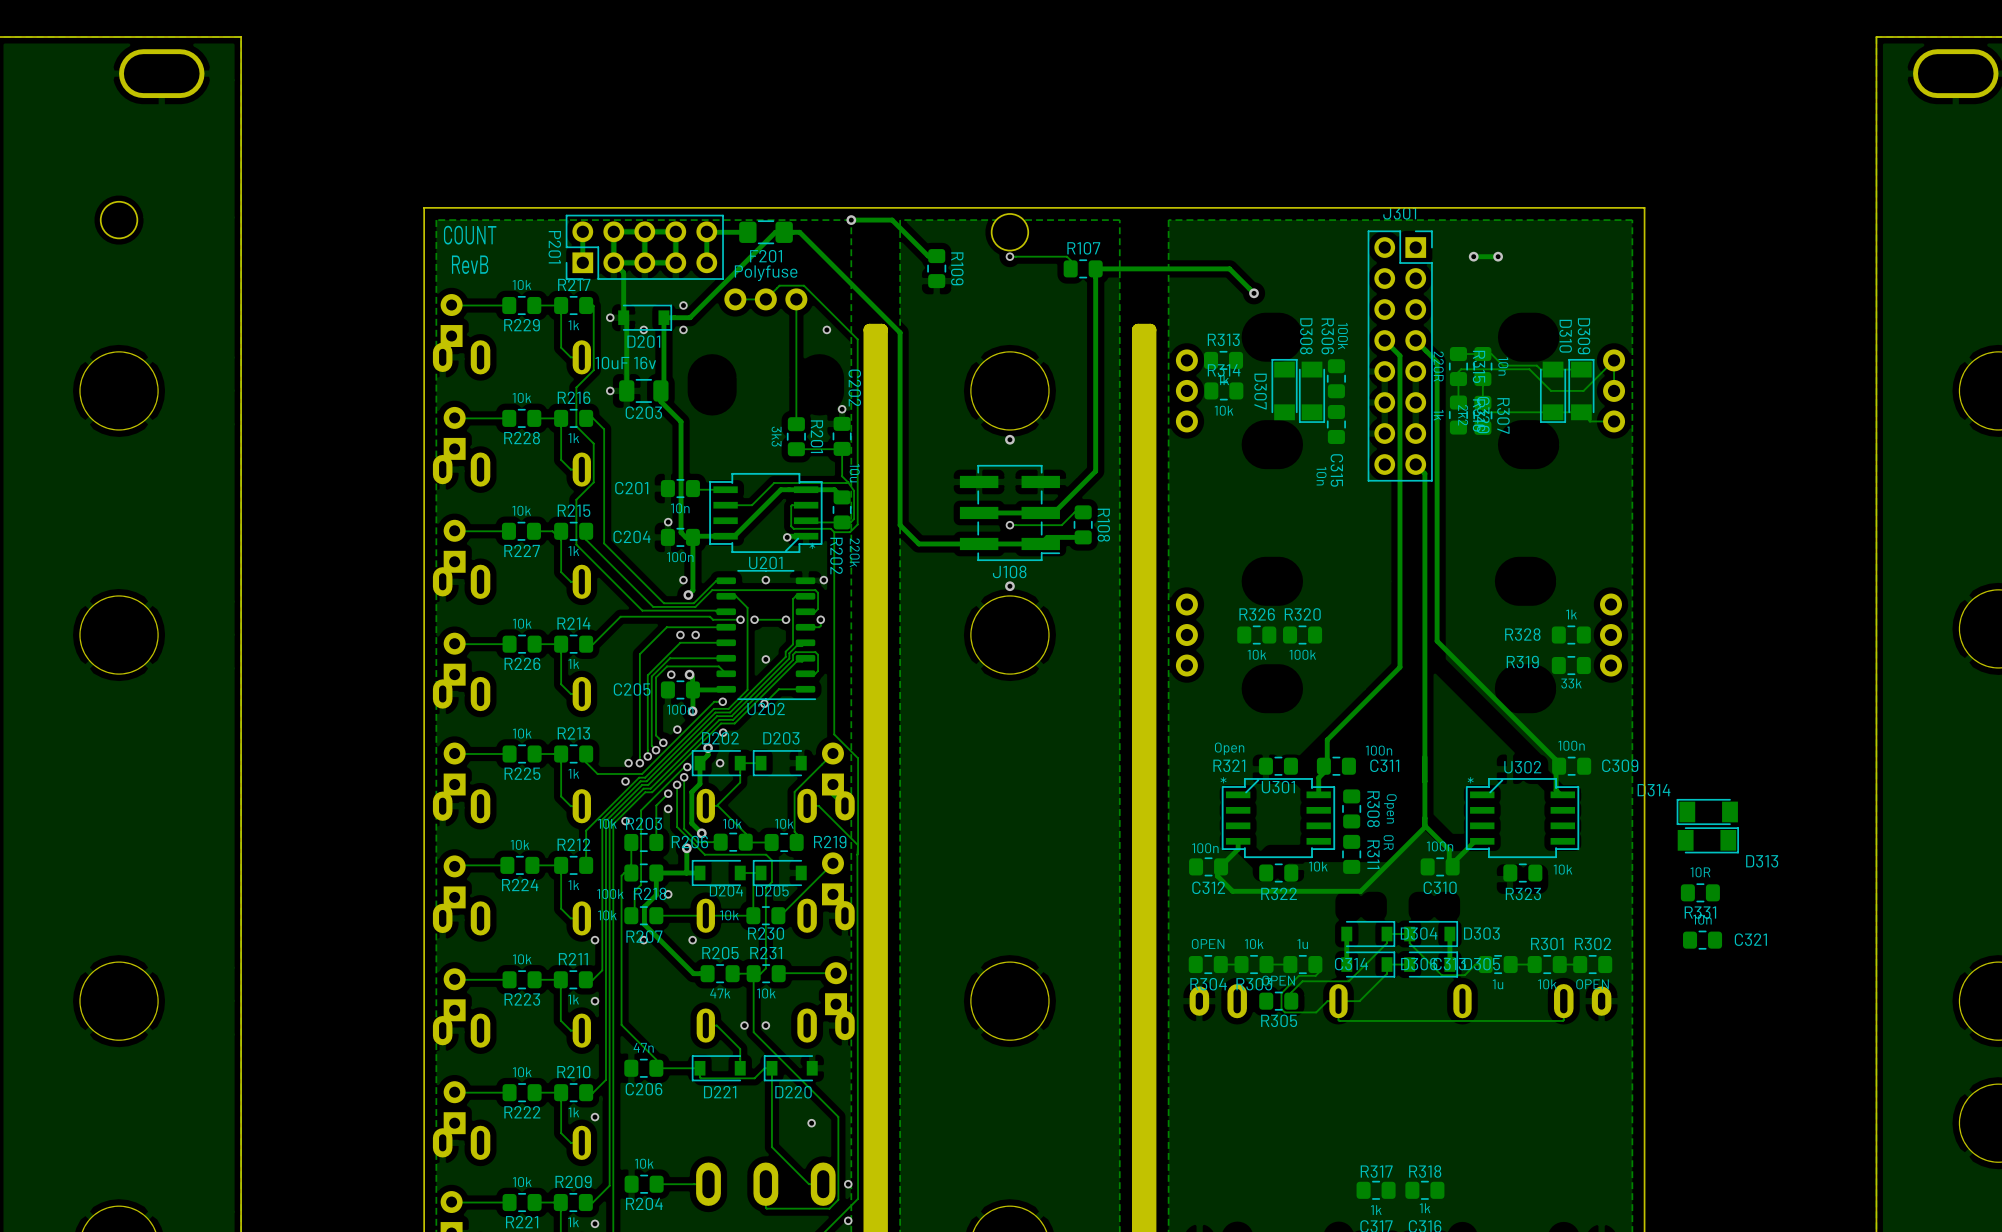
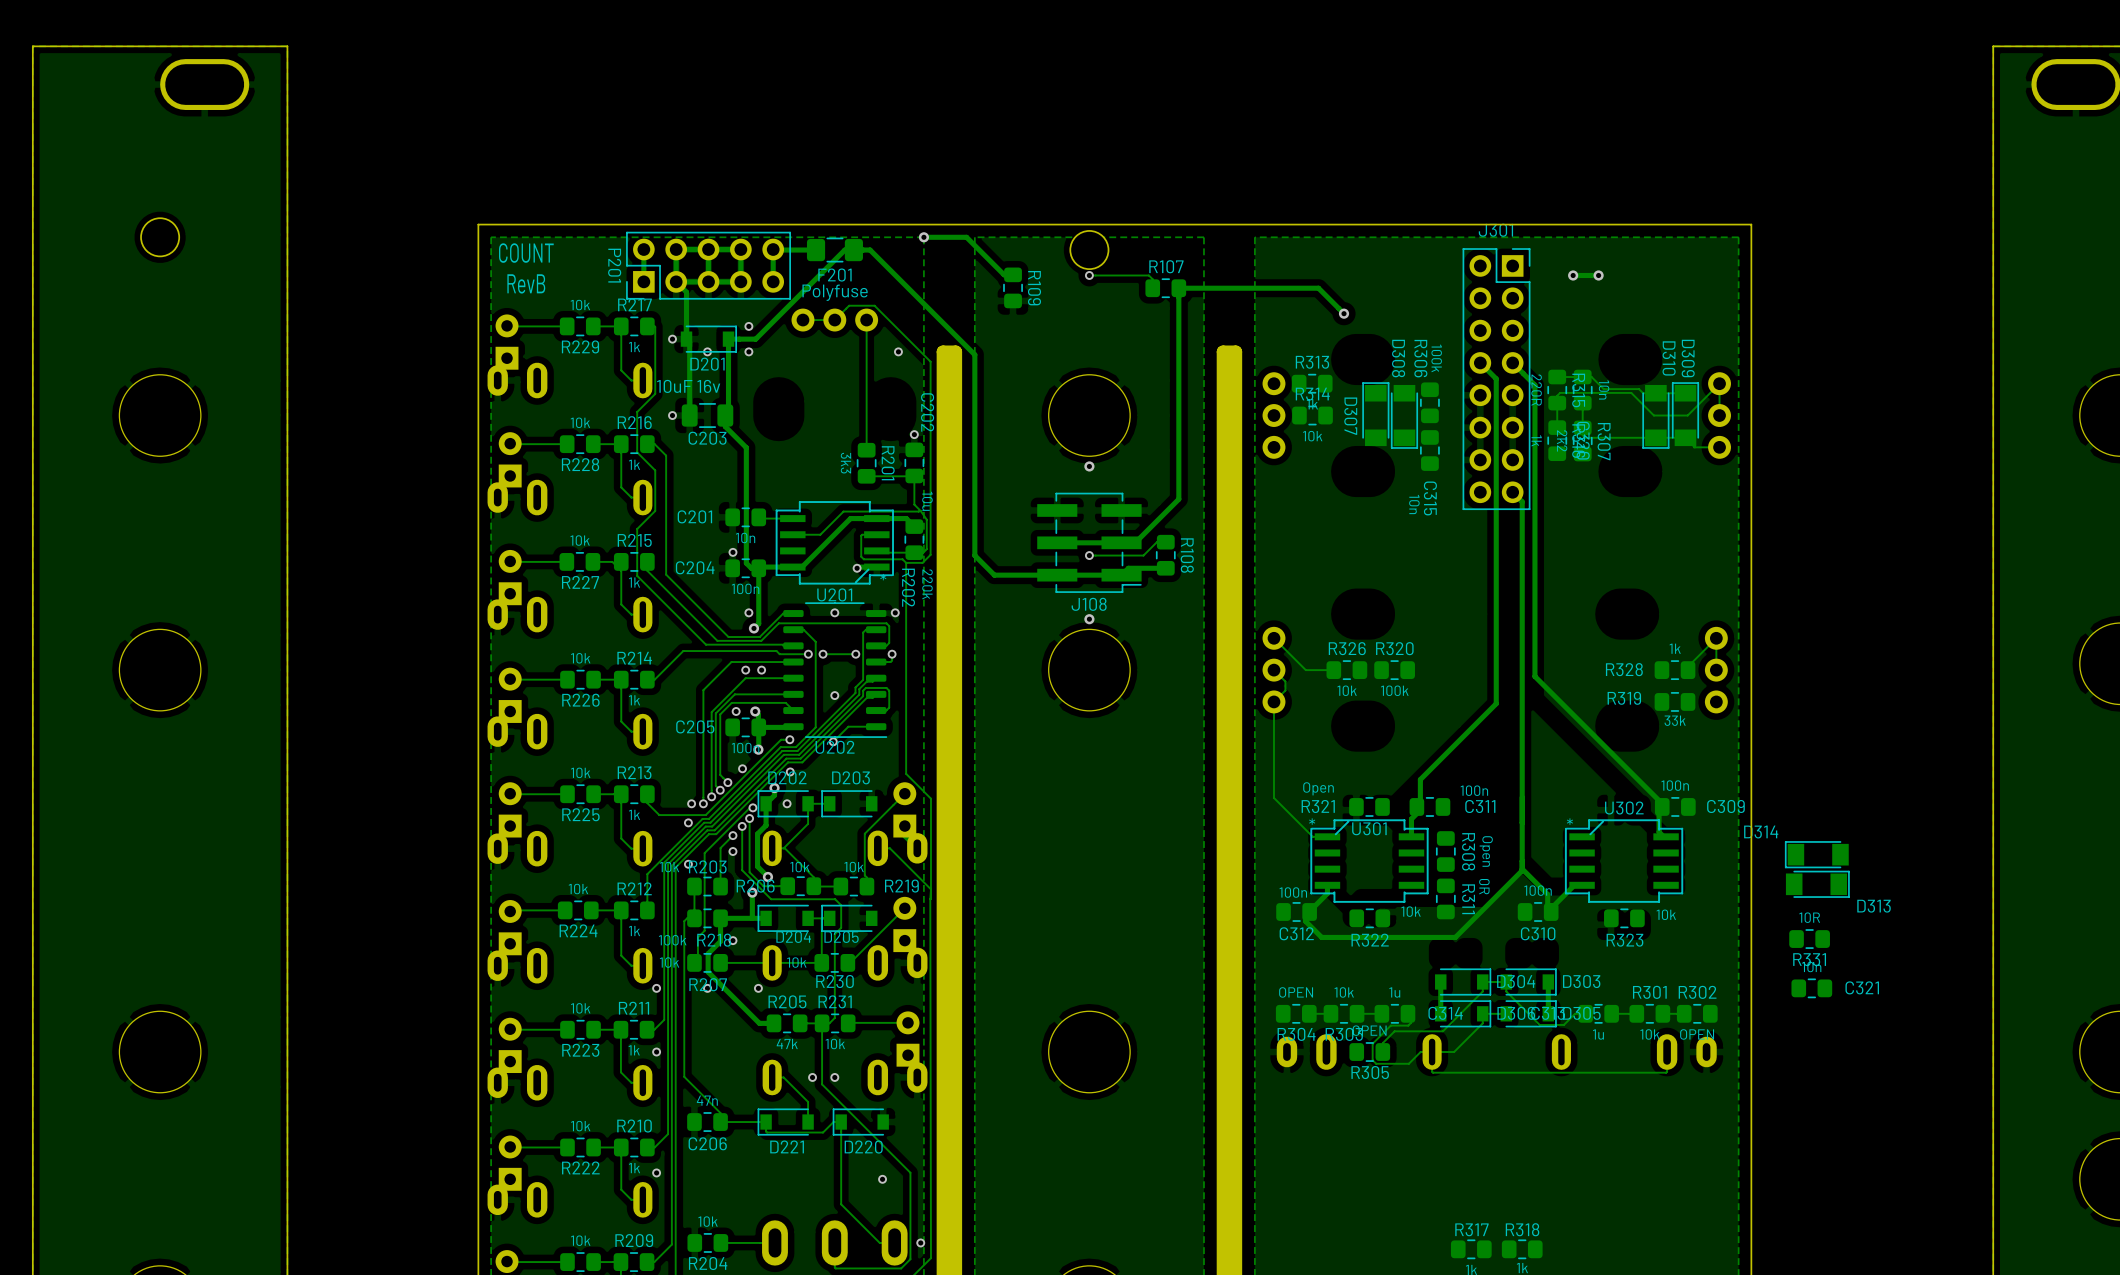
track: none -> (1273, 638) (1305, 670) (1333, 670)
track: none -> (1273, 670) (1285, 681) (1285, 690) (1273, 701) (1273, 797) (1312, 836) (1327, 836)
track: none -> (1716, 670) (1716, 638) (1688, 666) (1688, 670)

